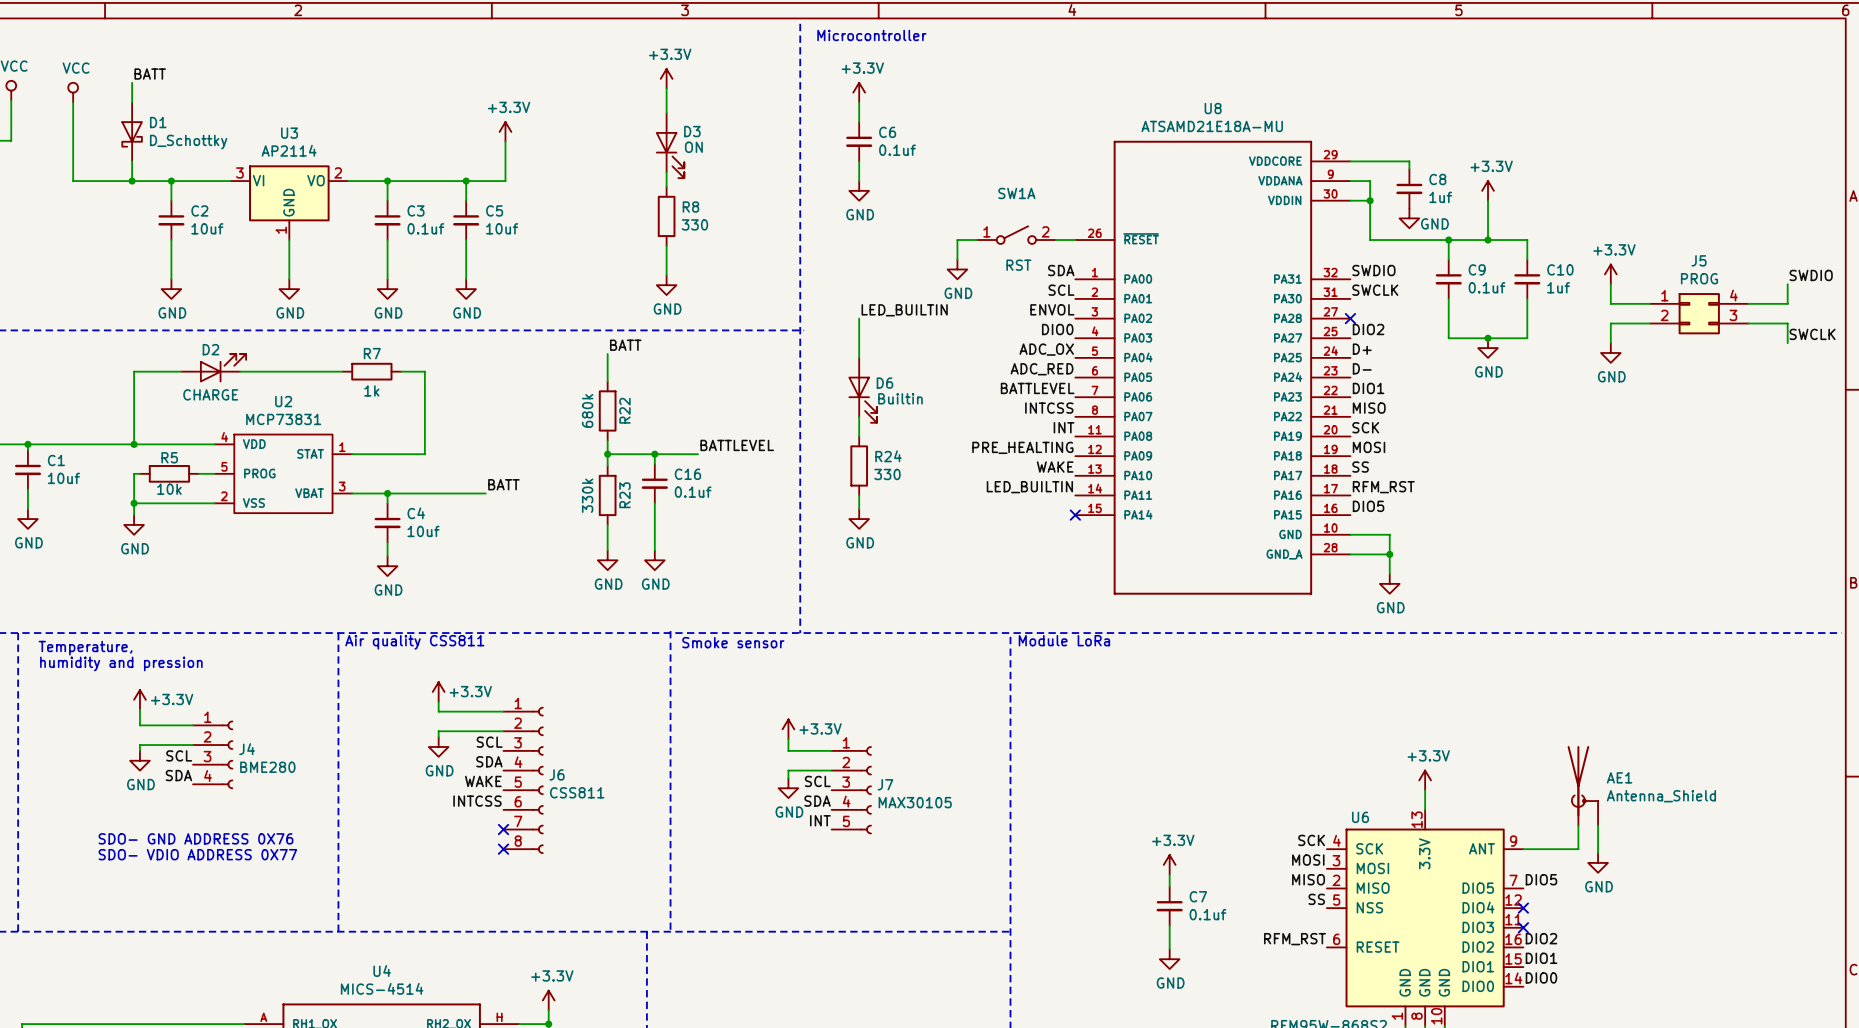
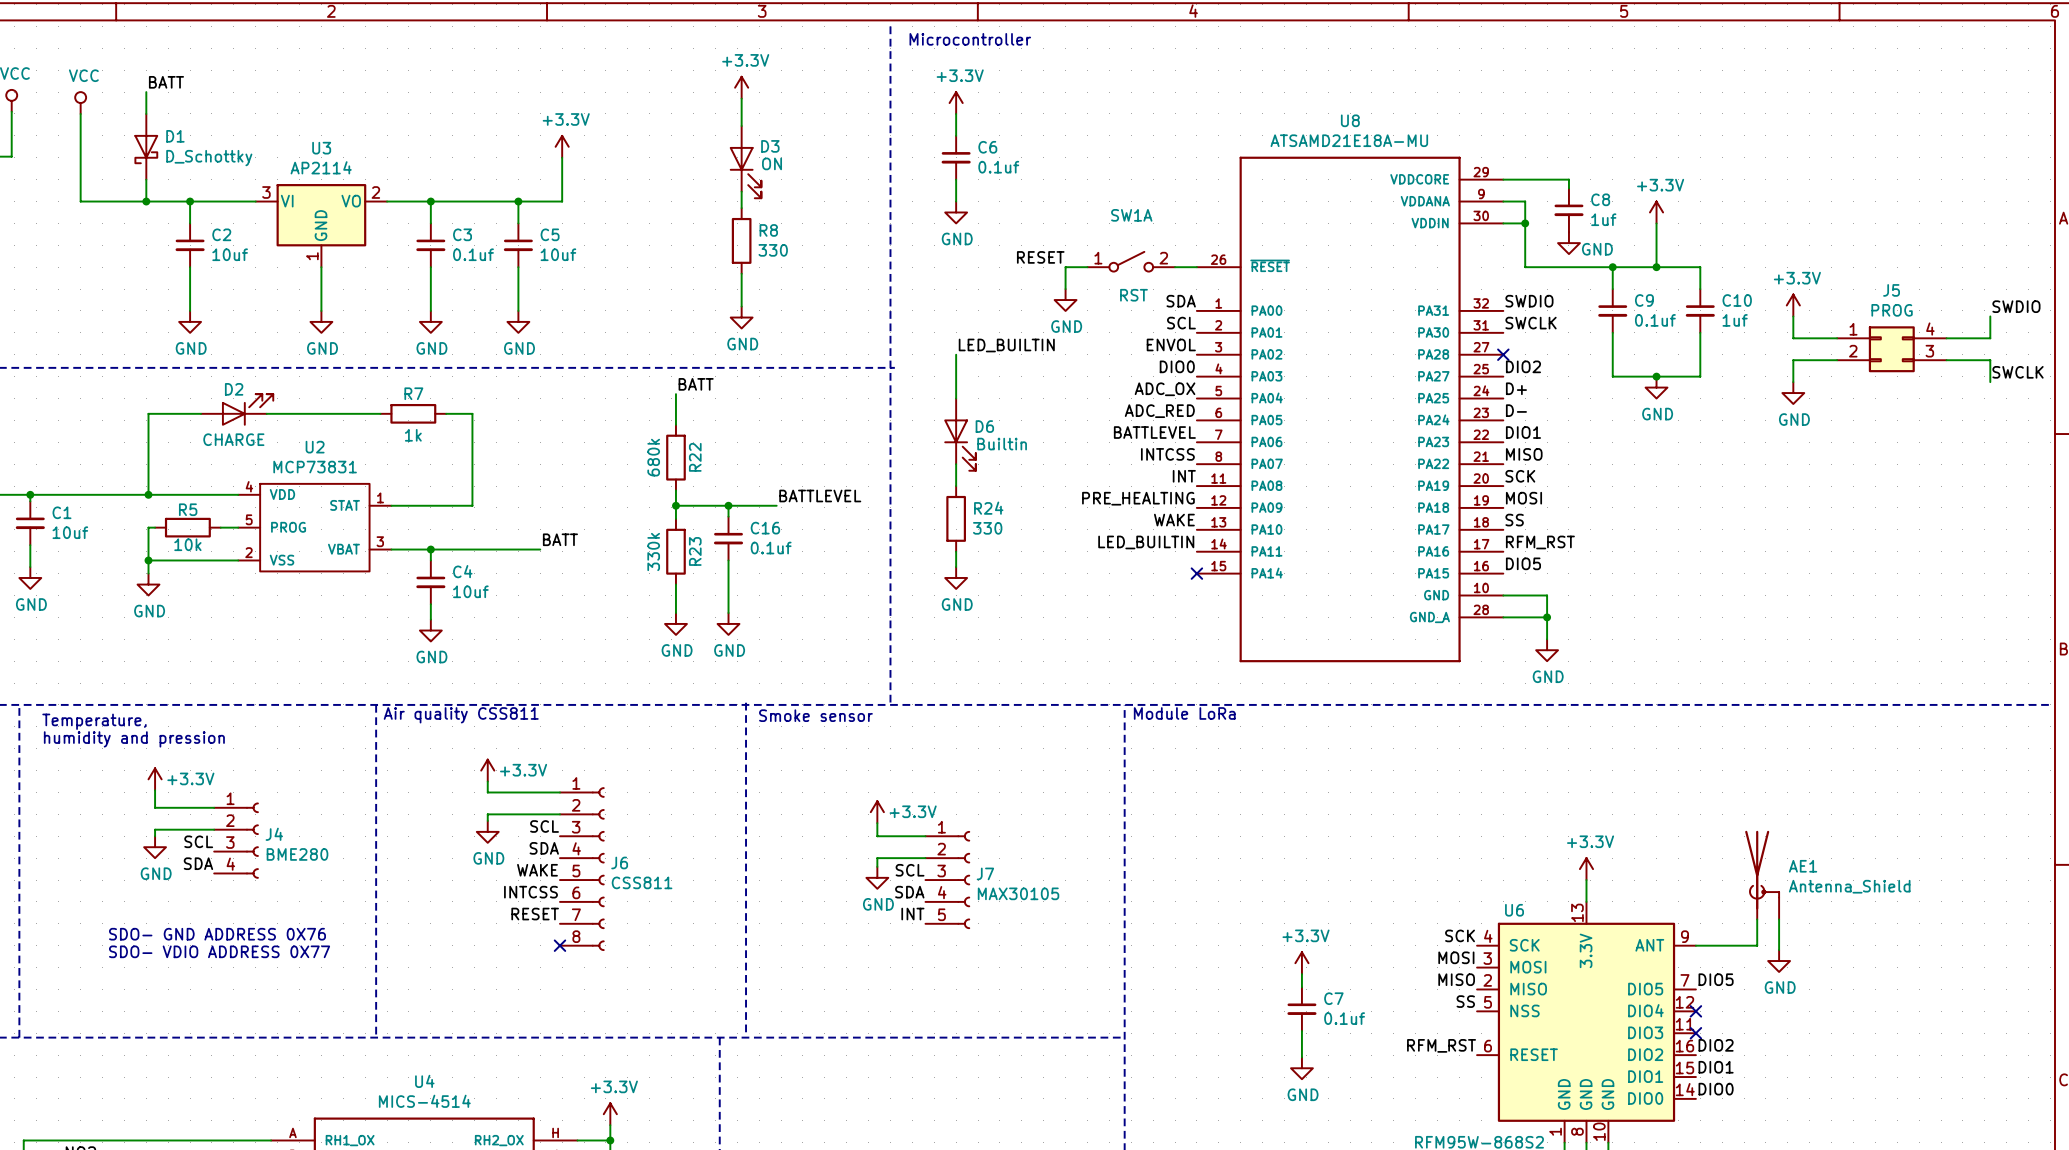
label: none -> RESET (1040, 257)
label: none -> RESET (535, 914)
no-connect mark: (503, 829) -> none

